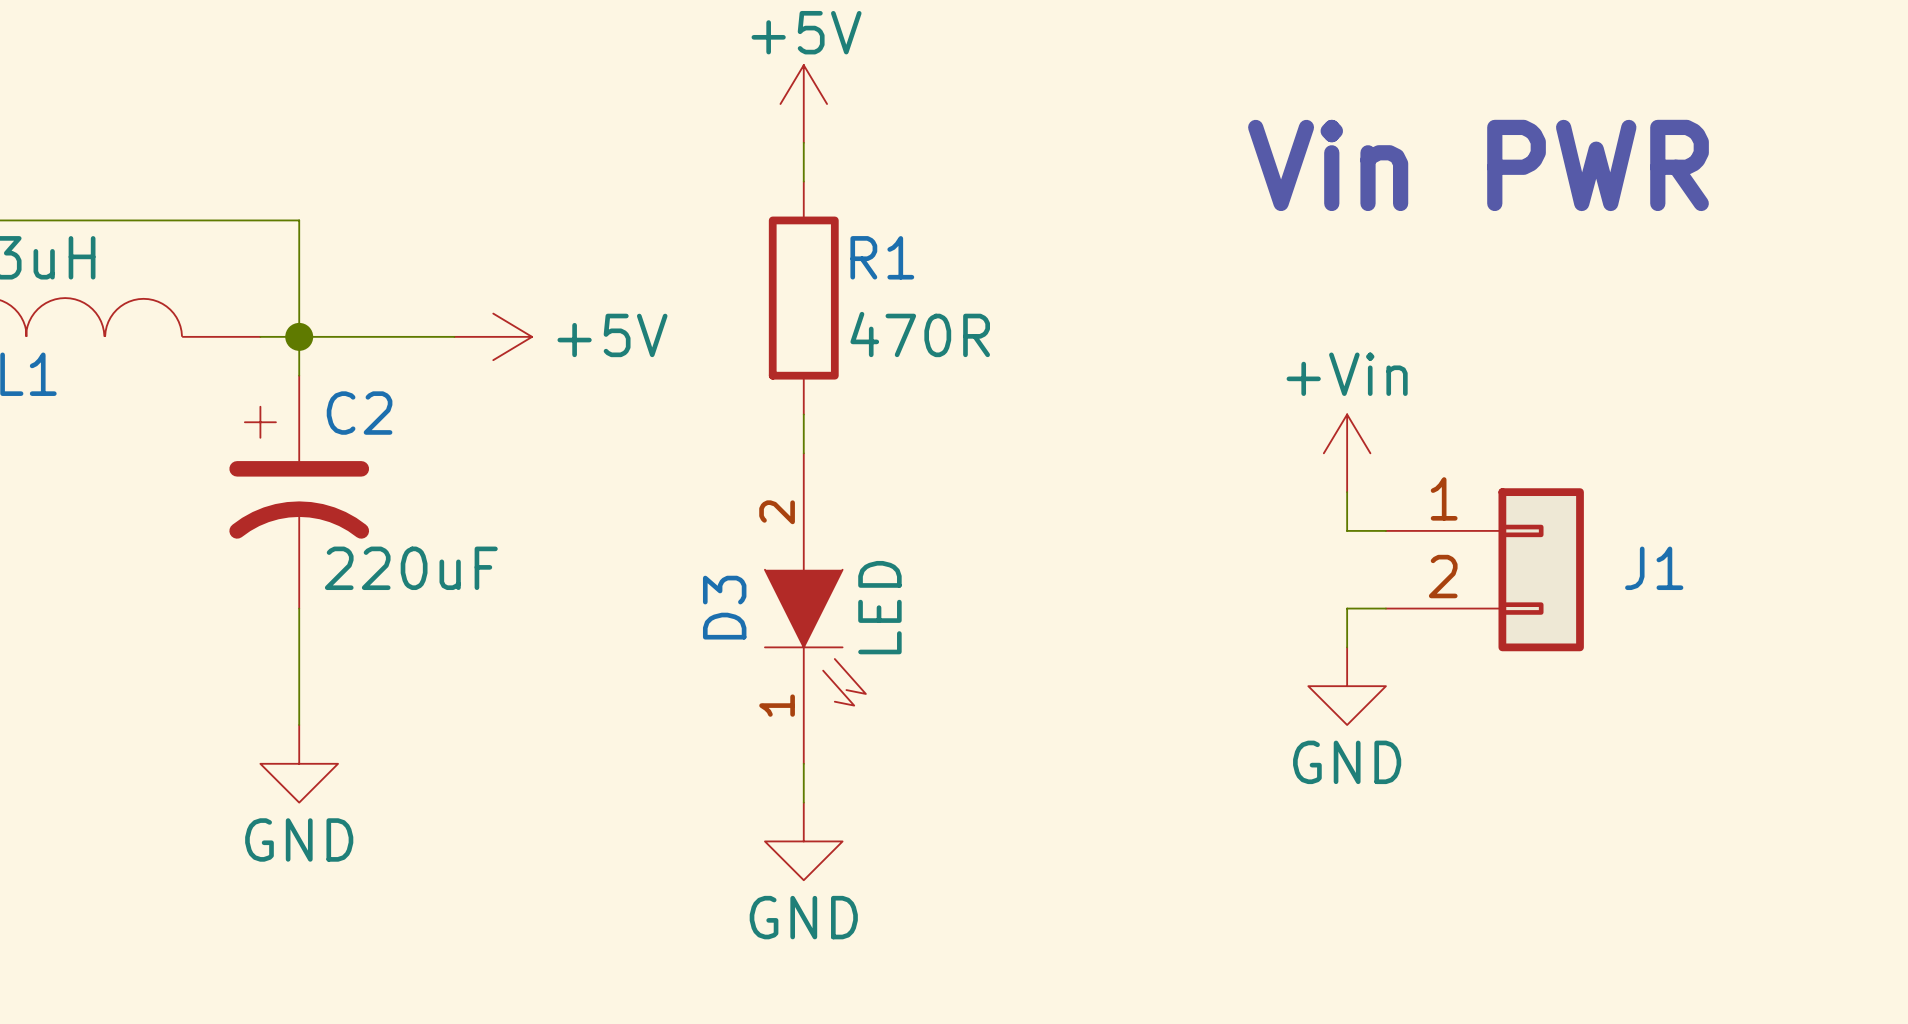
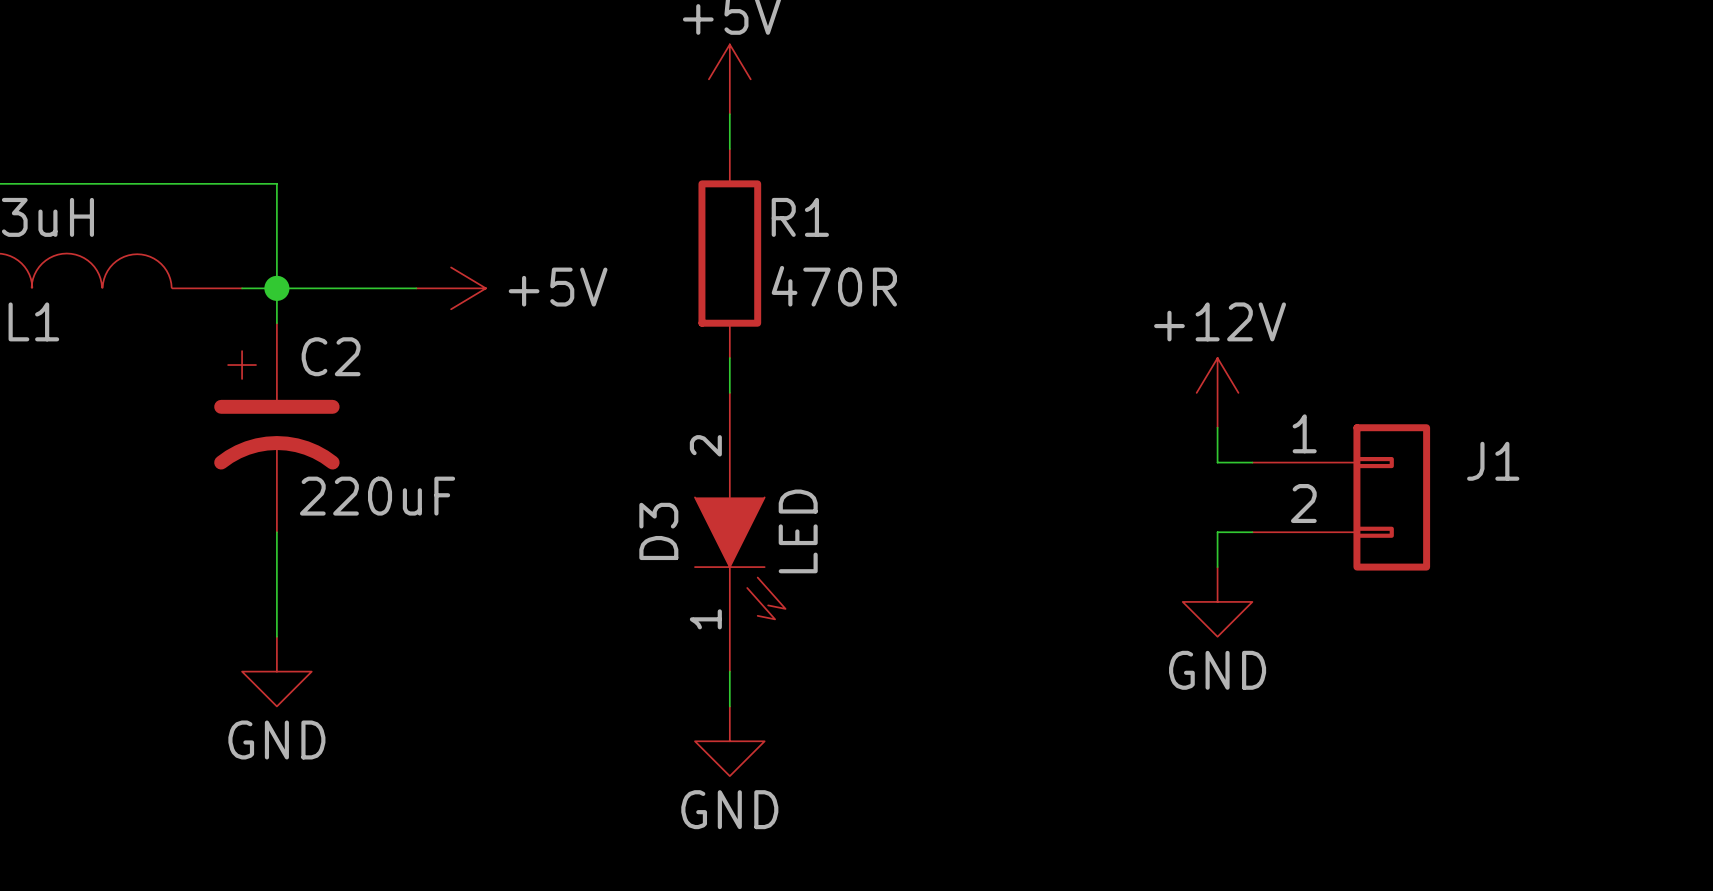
text: Vin PWR (1478, 165) -> none
power symbol: +Vin (1347, 453) -> +12V (1217, 392)
J1 name position: J1 (1654, 568) -> J1 (1493, 461)

